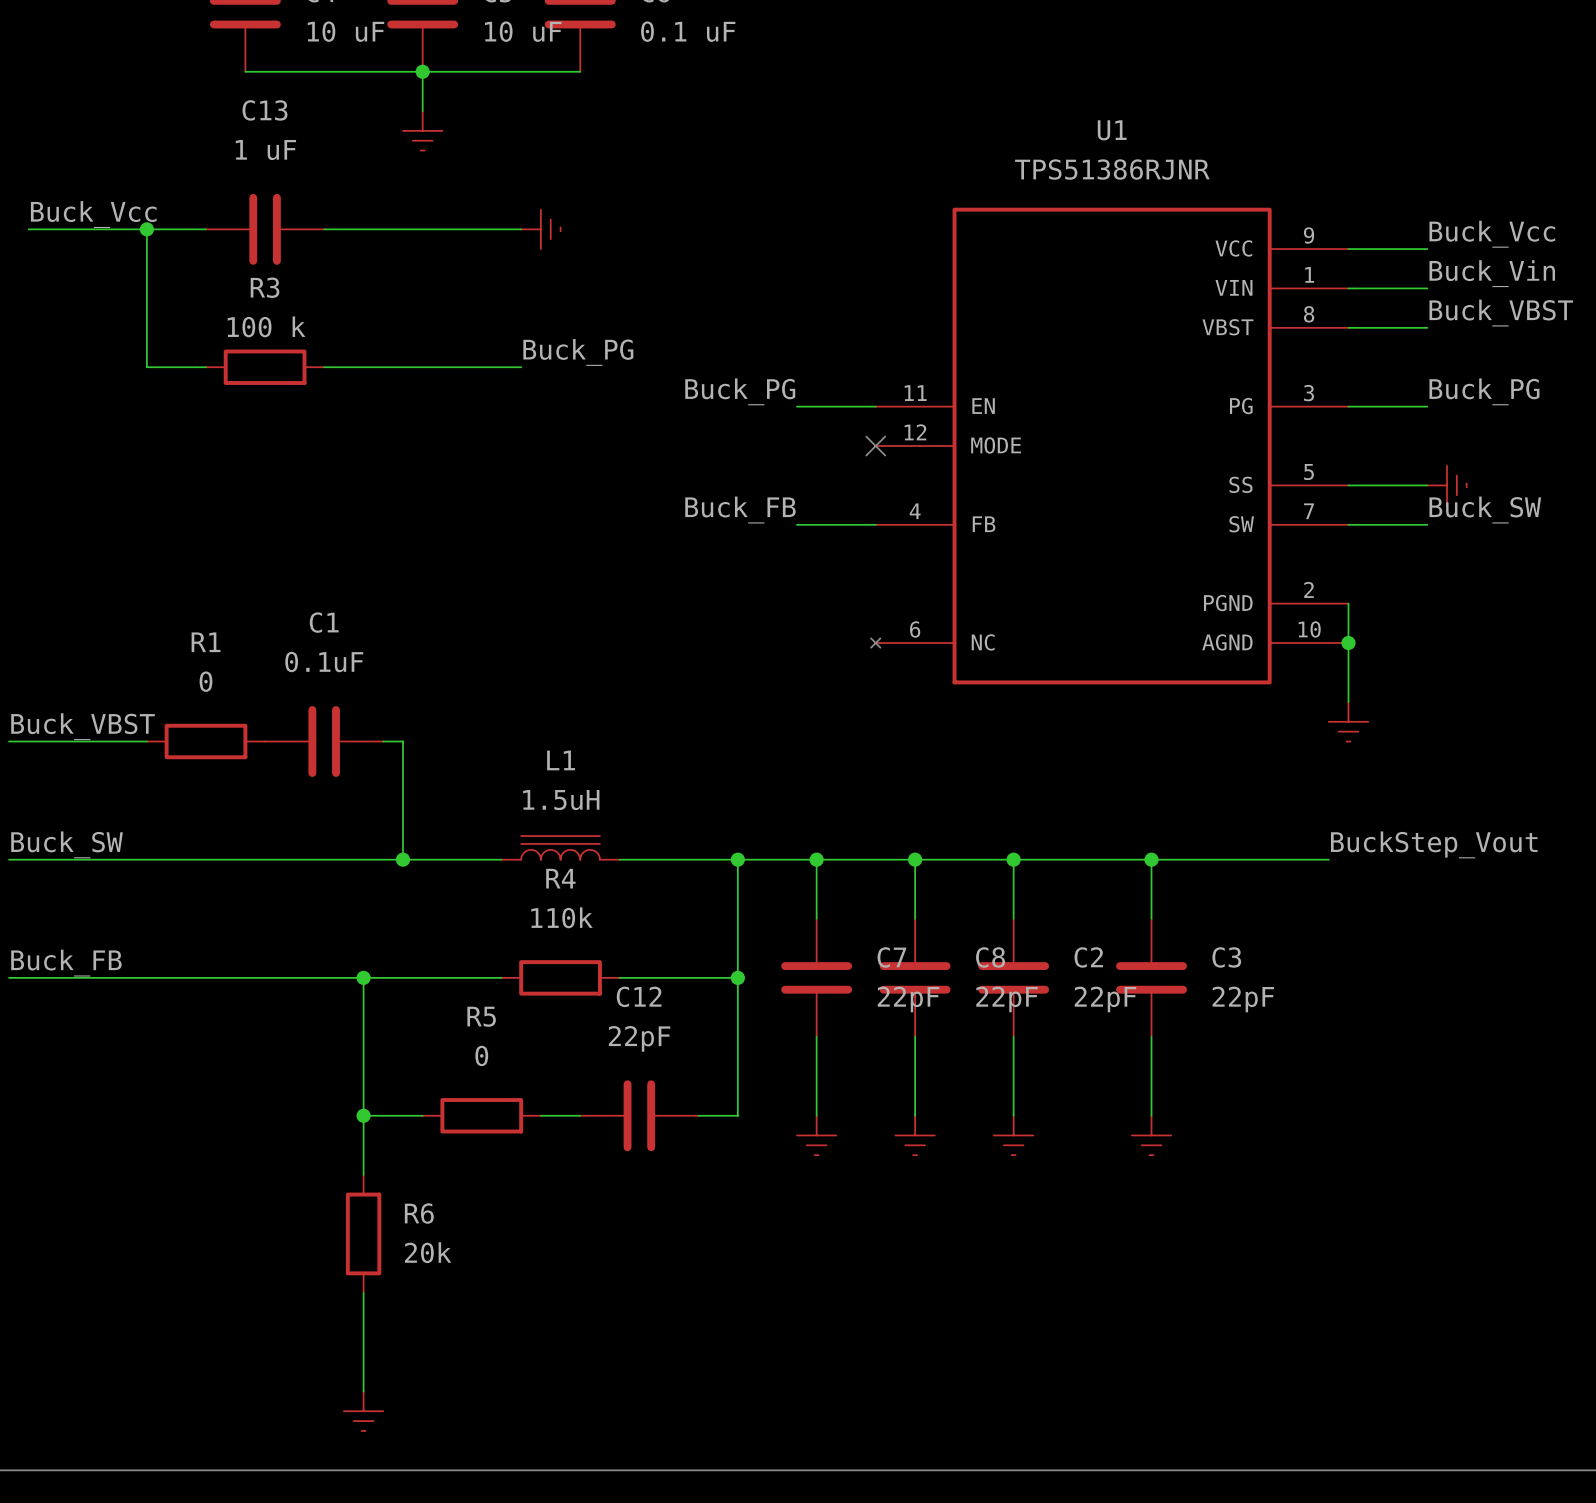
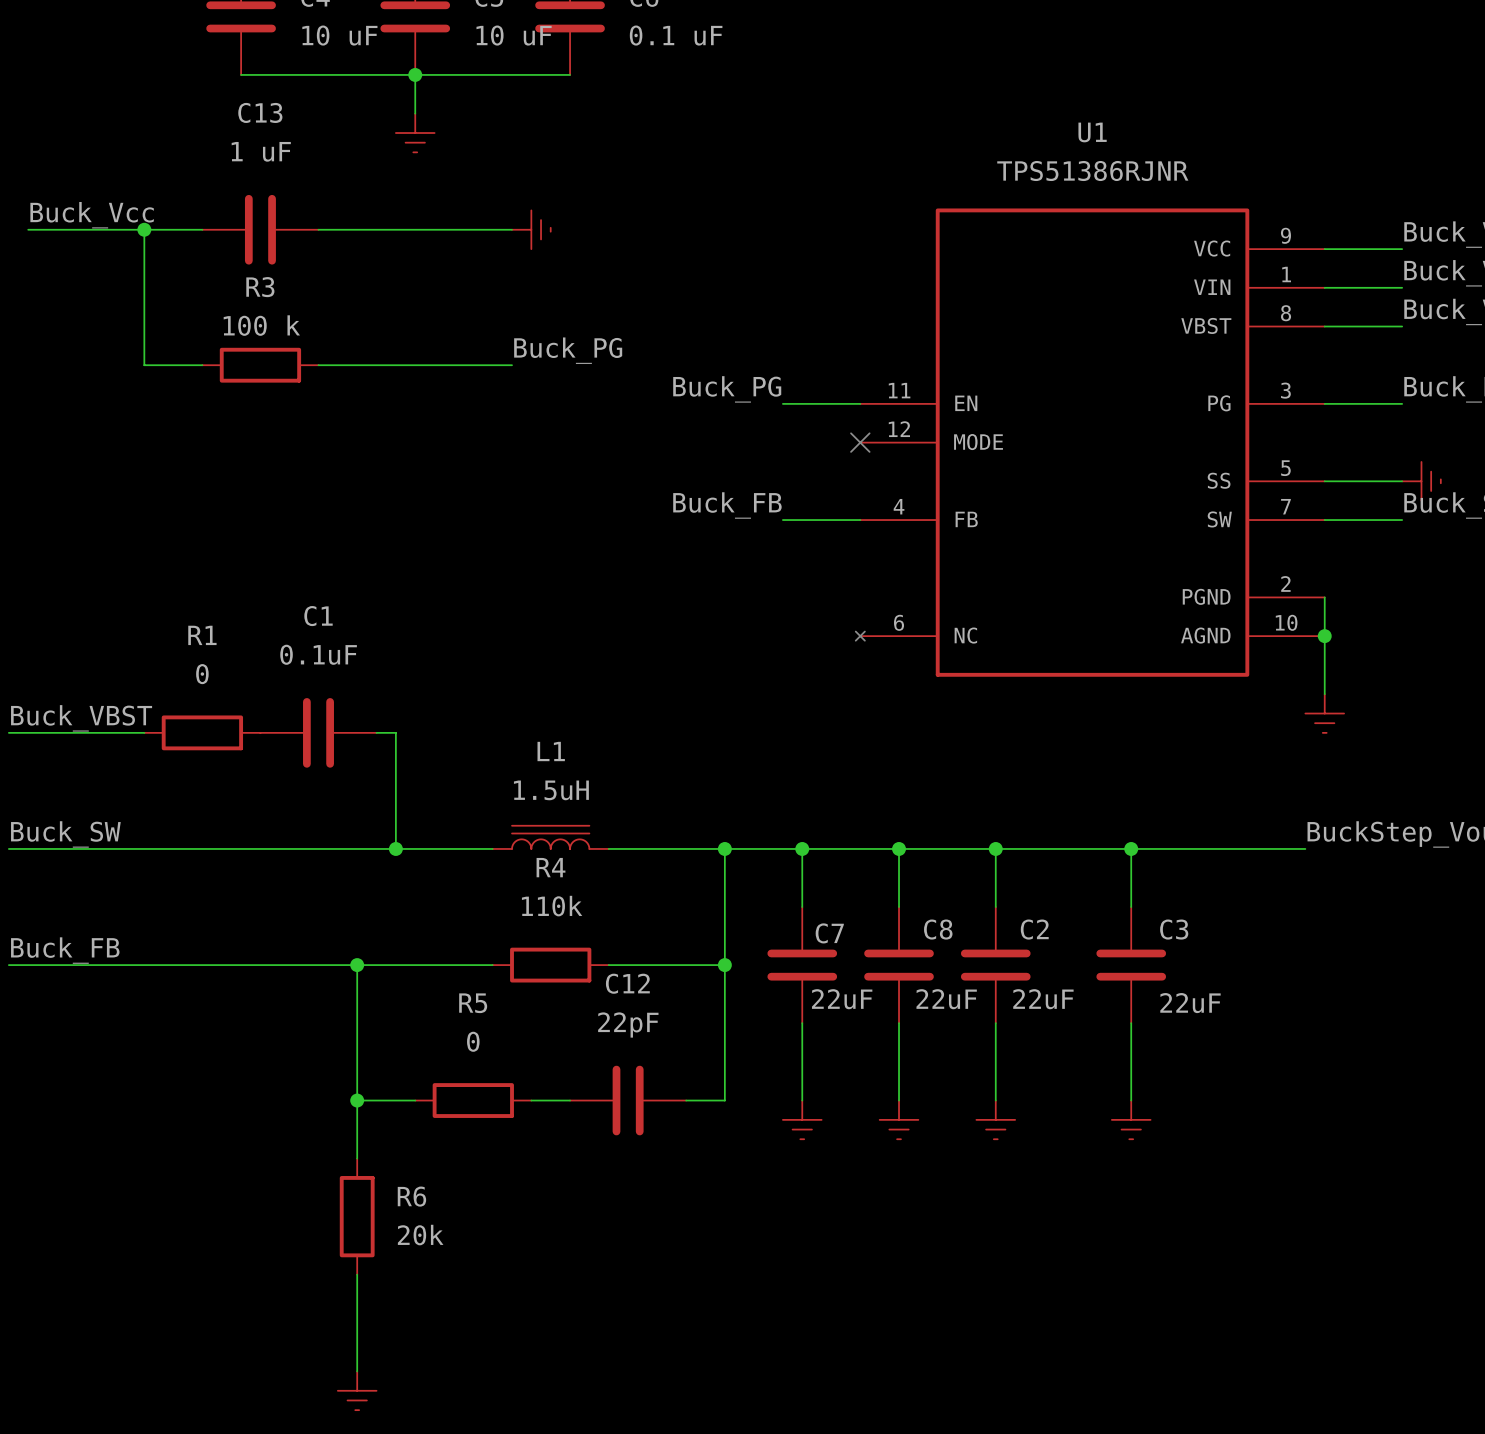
C7 name position: C7 (891, 957) -> C7 (829, 933)
C8 name position: C8 (990, 957) -> C8 (938, 929)
C2 name position: C2 (1088, 957) -> C2 (1034, 929)
C3 name position: C3 (1226, 957) -> C3 (1174, 929)
C7 value: 22pF (908, 999) -> 22uF (842, 999)
C8 value: 22pF (1006, 999) -> 22uF (946, 999)
C2 value: 22pF (1105, 999) -> 22uF (1043, 999)
C3 value: 22pF (1243, 999) -> 22uF (1190, 1003)

